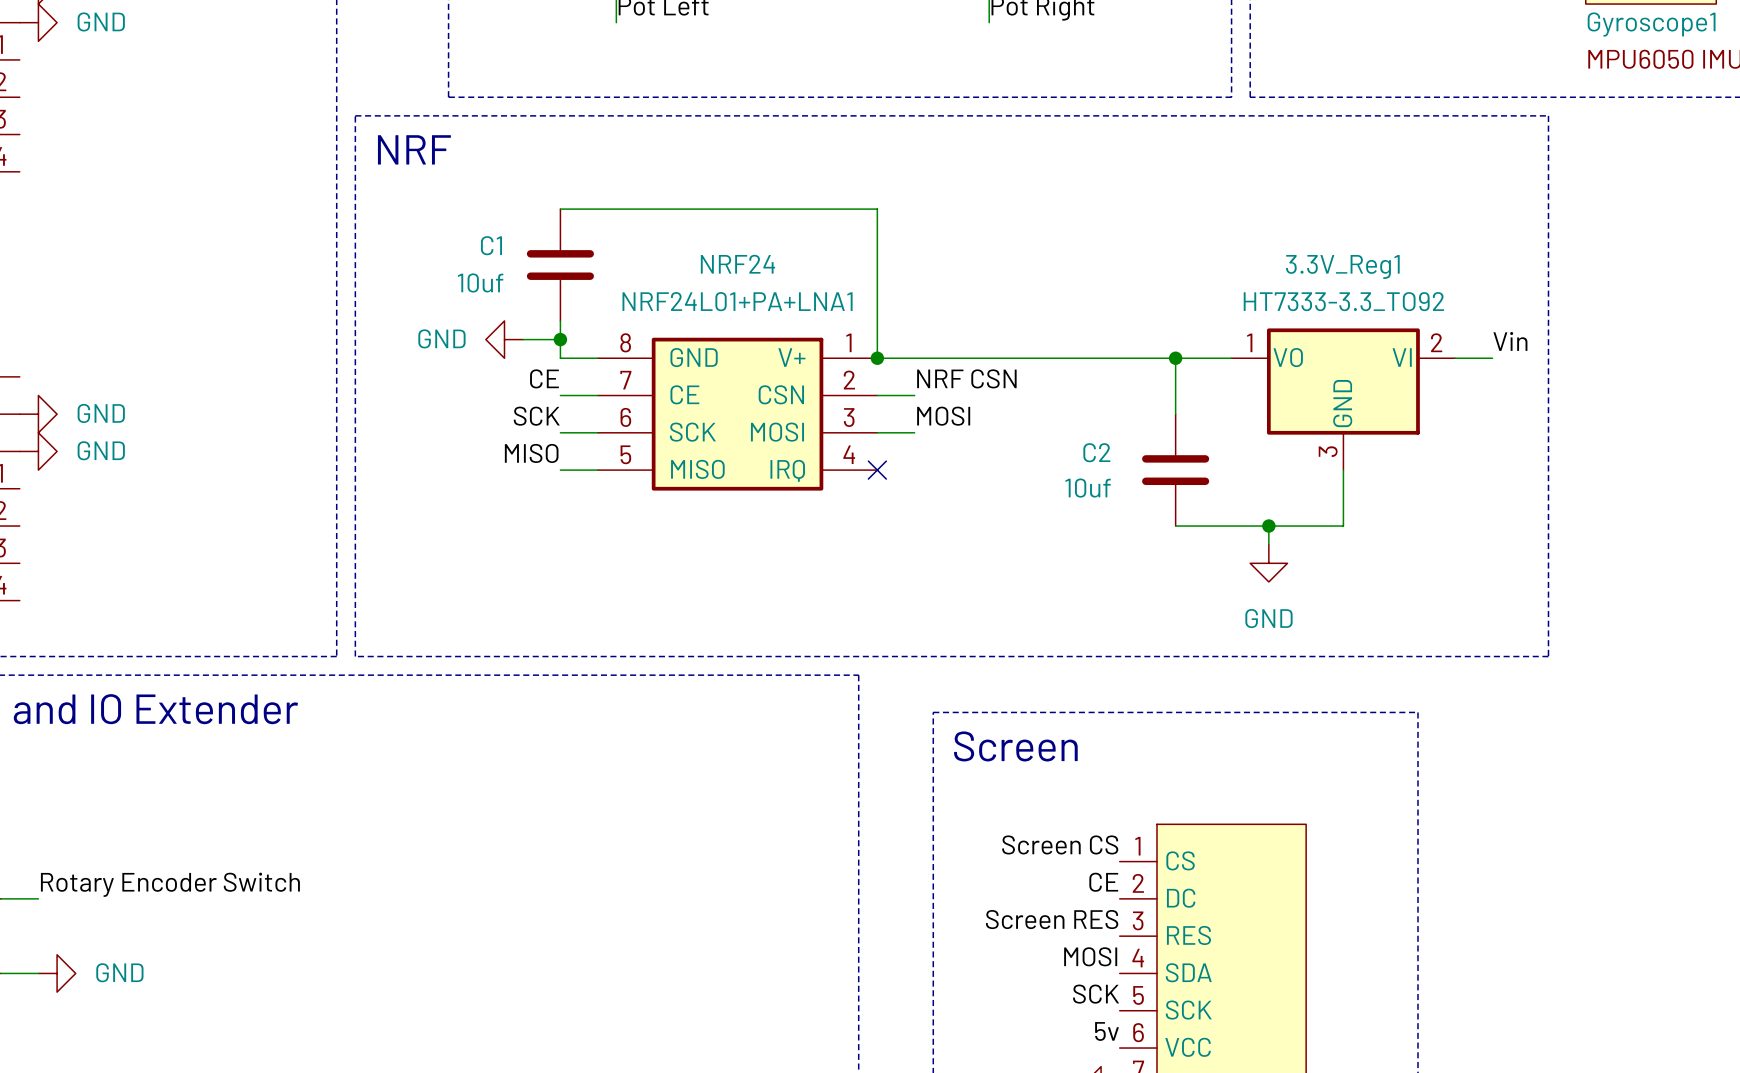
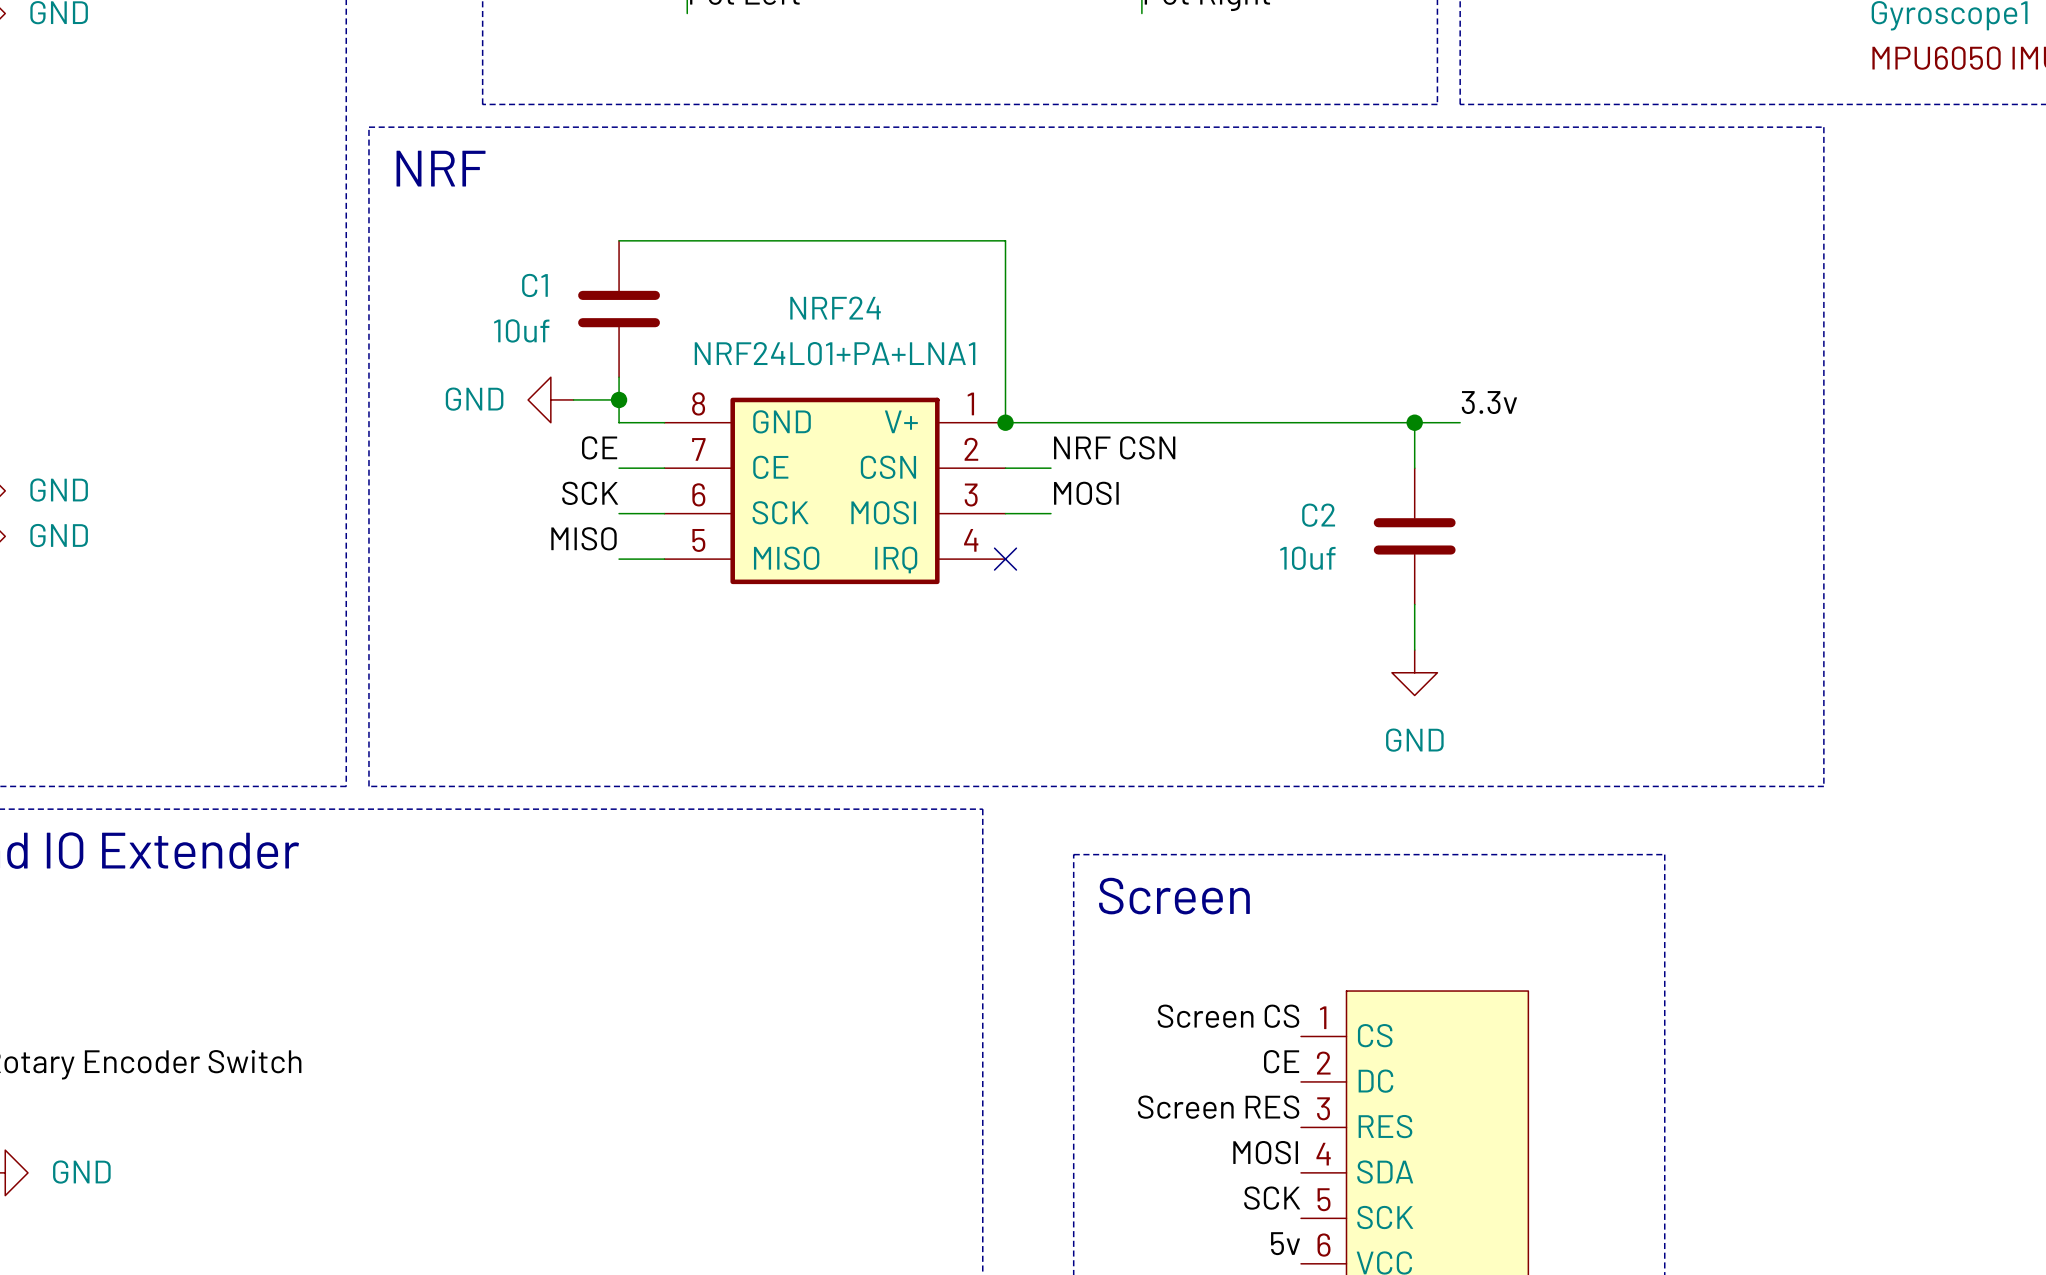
label: none -> 3.3v (1489, 402)
label: Vin (1510, 341) -> none
wire: (1175, 358) (1175, 414) -> none
junction position: (1175, 358) -> (1414, 422)
wire: none -> (1414, 422) (1414, 468)
wire: (1455, 358) (1492, 358) -> none
3.3V_Reg1: HT7333-3.3_TO92 (1343, 399) -> none
C2 position: (1175, 470) -> (1414, 536)
wire: (1343, 470) (1343, 526) (1175, 526) -> none
wire: none -> (1414, 604) (1414, 650)
wire: (1268, 526) (1268, 544) -> none
junction: (1268, 526) -> none
power symbol position: GND (1268, 563) -> GND (1414, 672)

